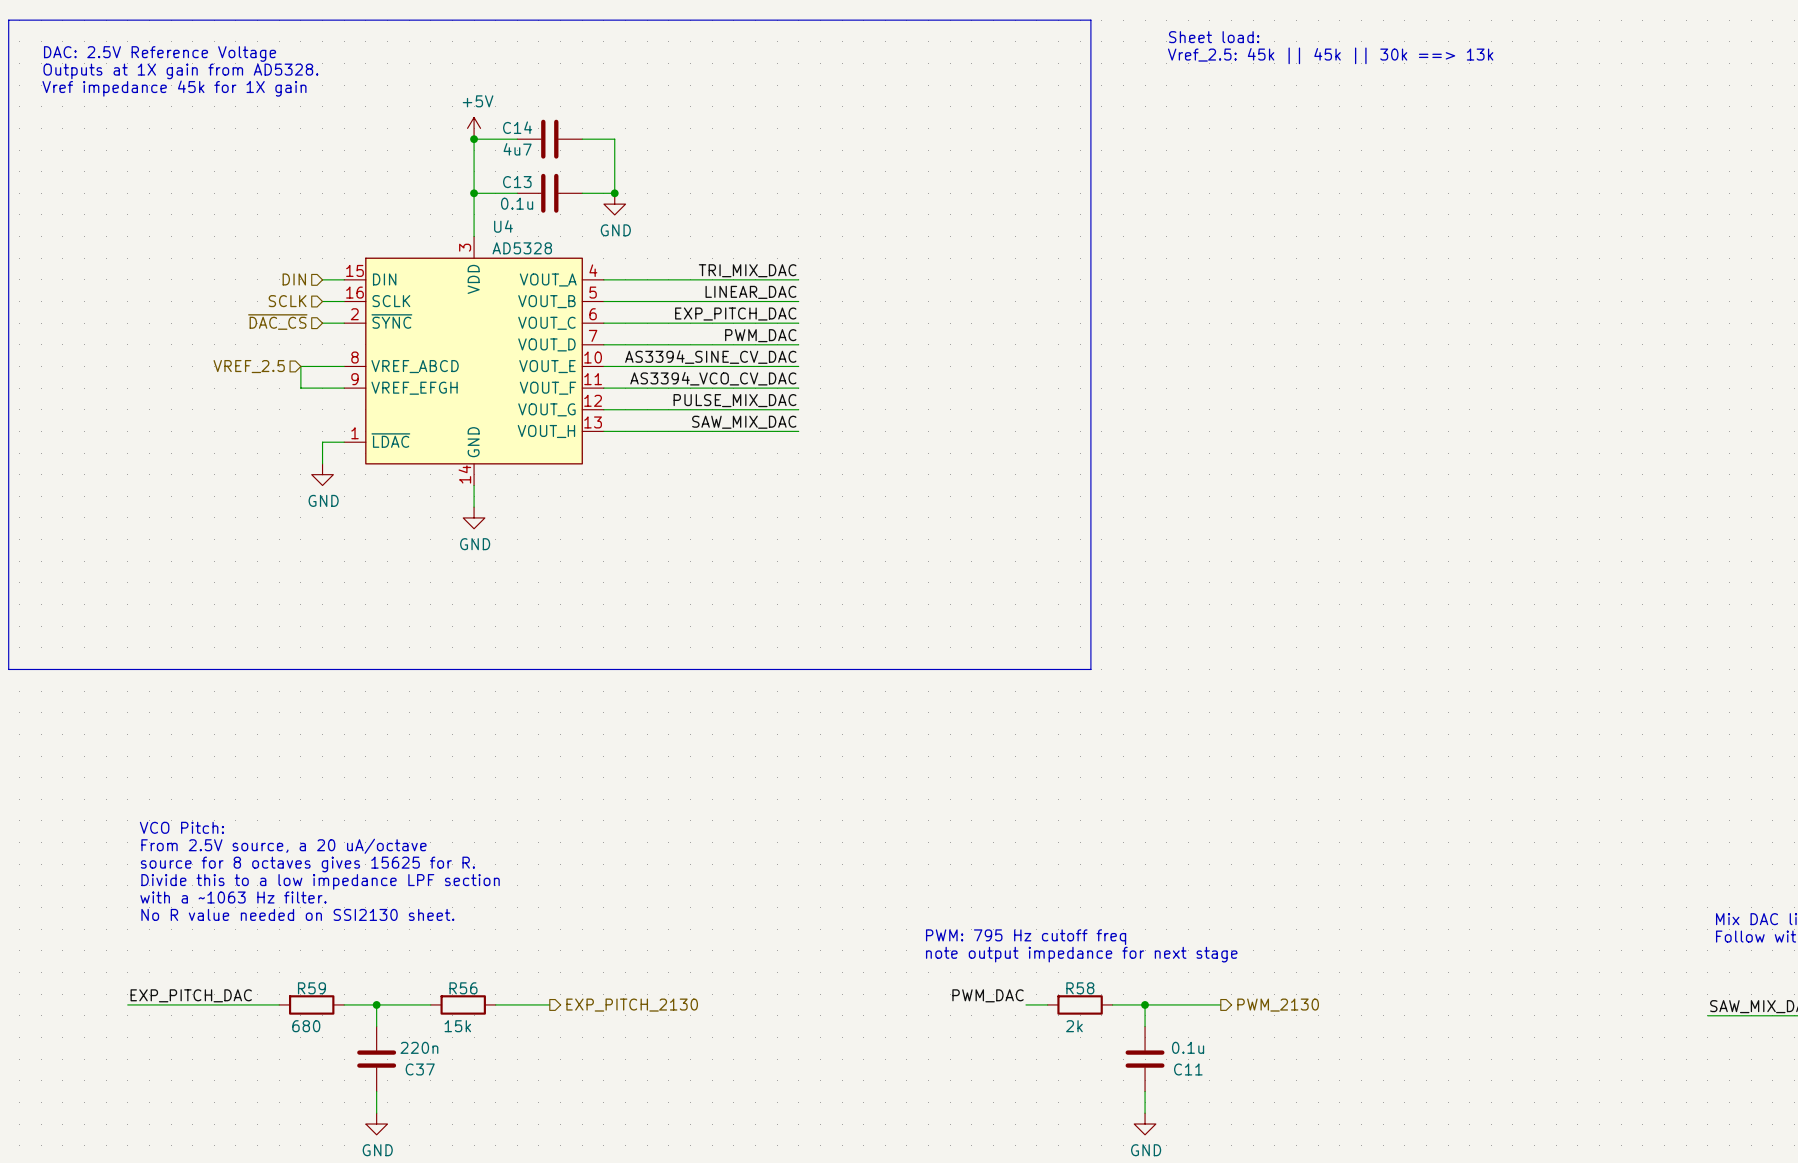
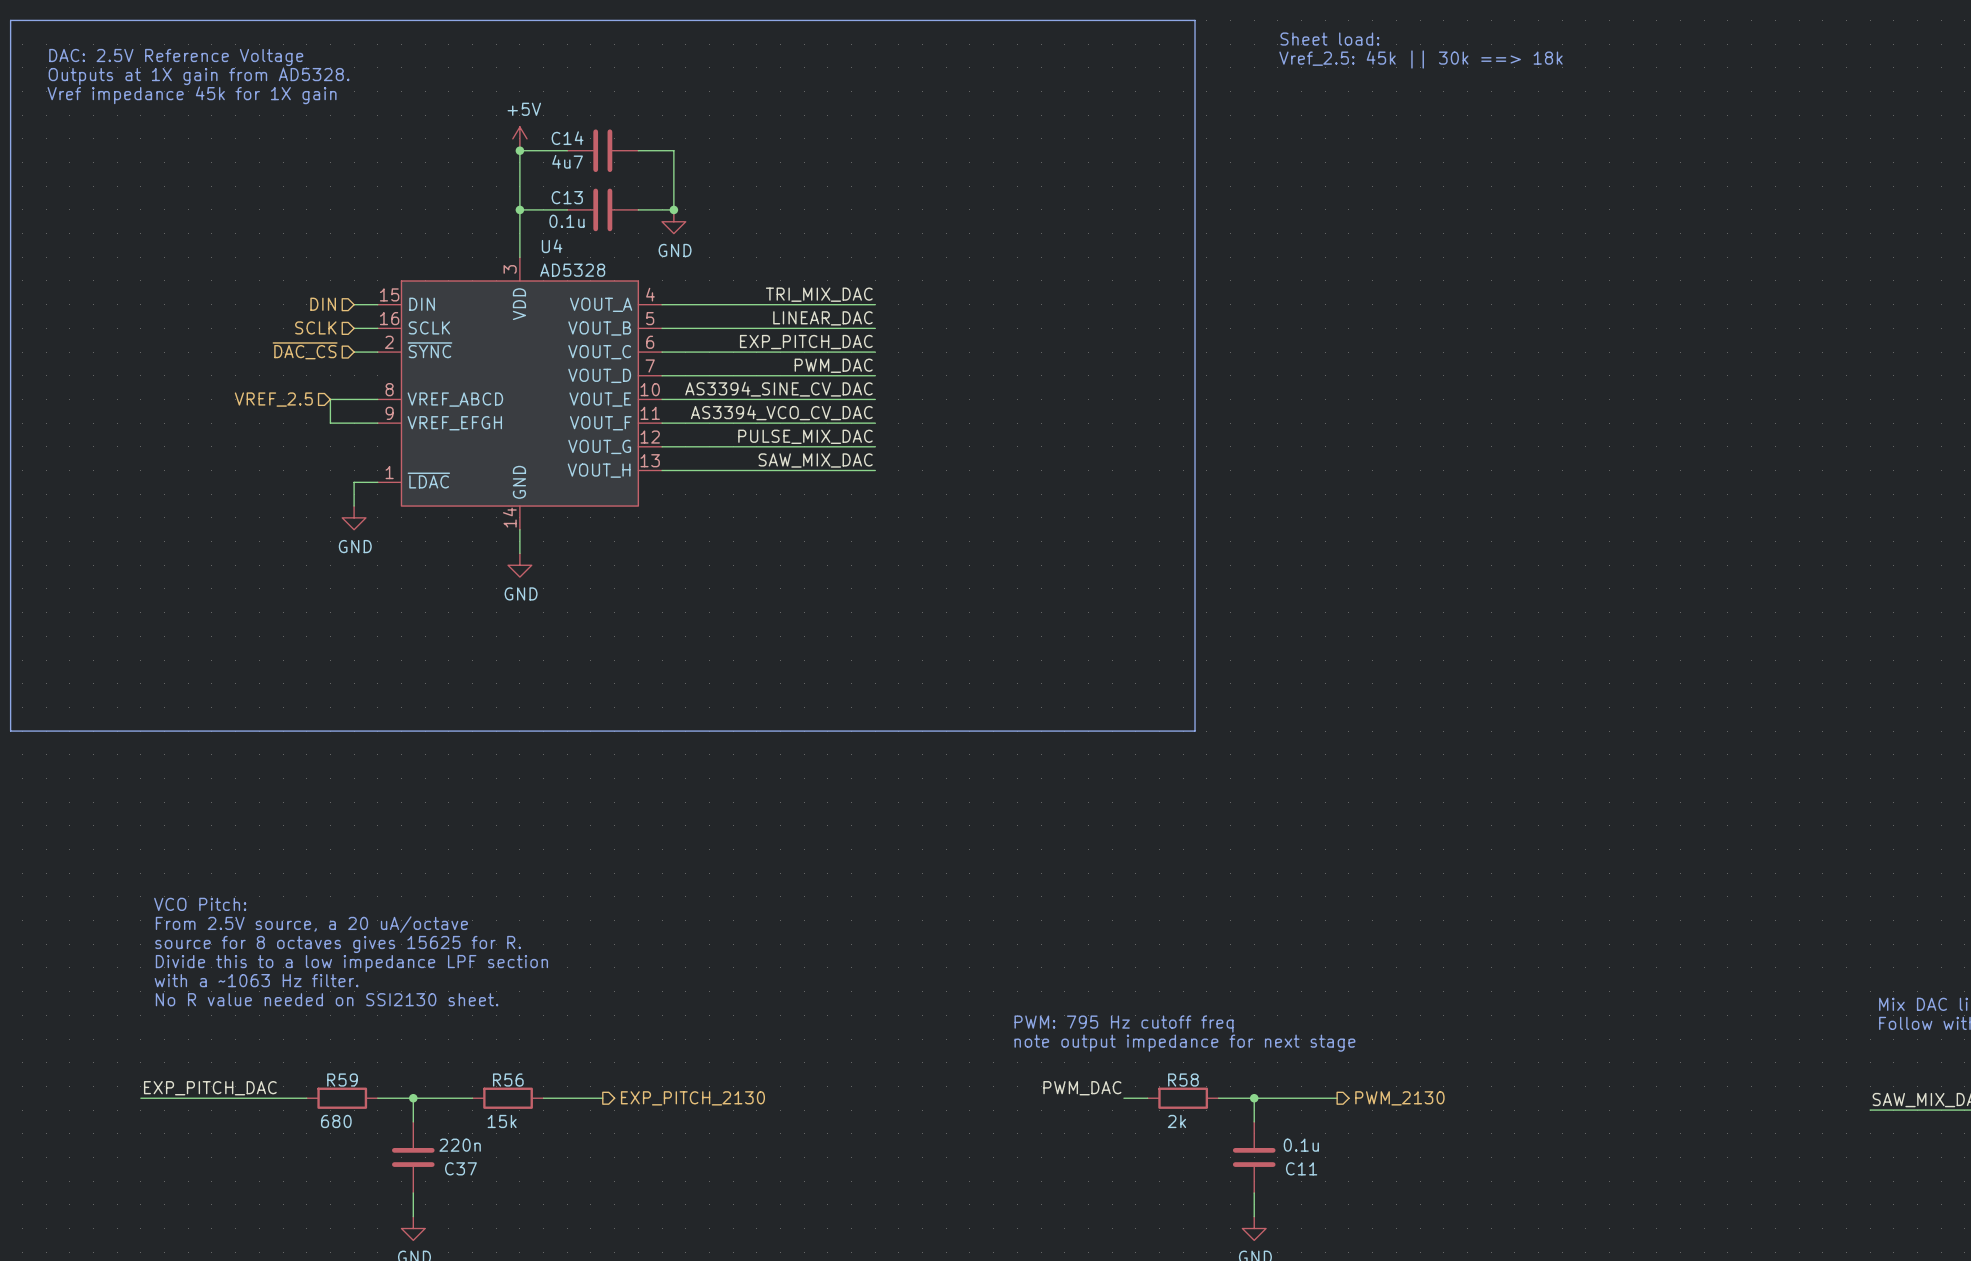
text: Vref_2.5: 45k || 45k || 30k ==> 13k (1330, 55) -> Vref_2.5: 45k || 30k ==> 18k (1420, 59)

